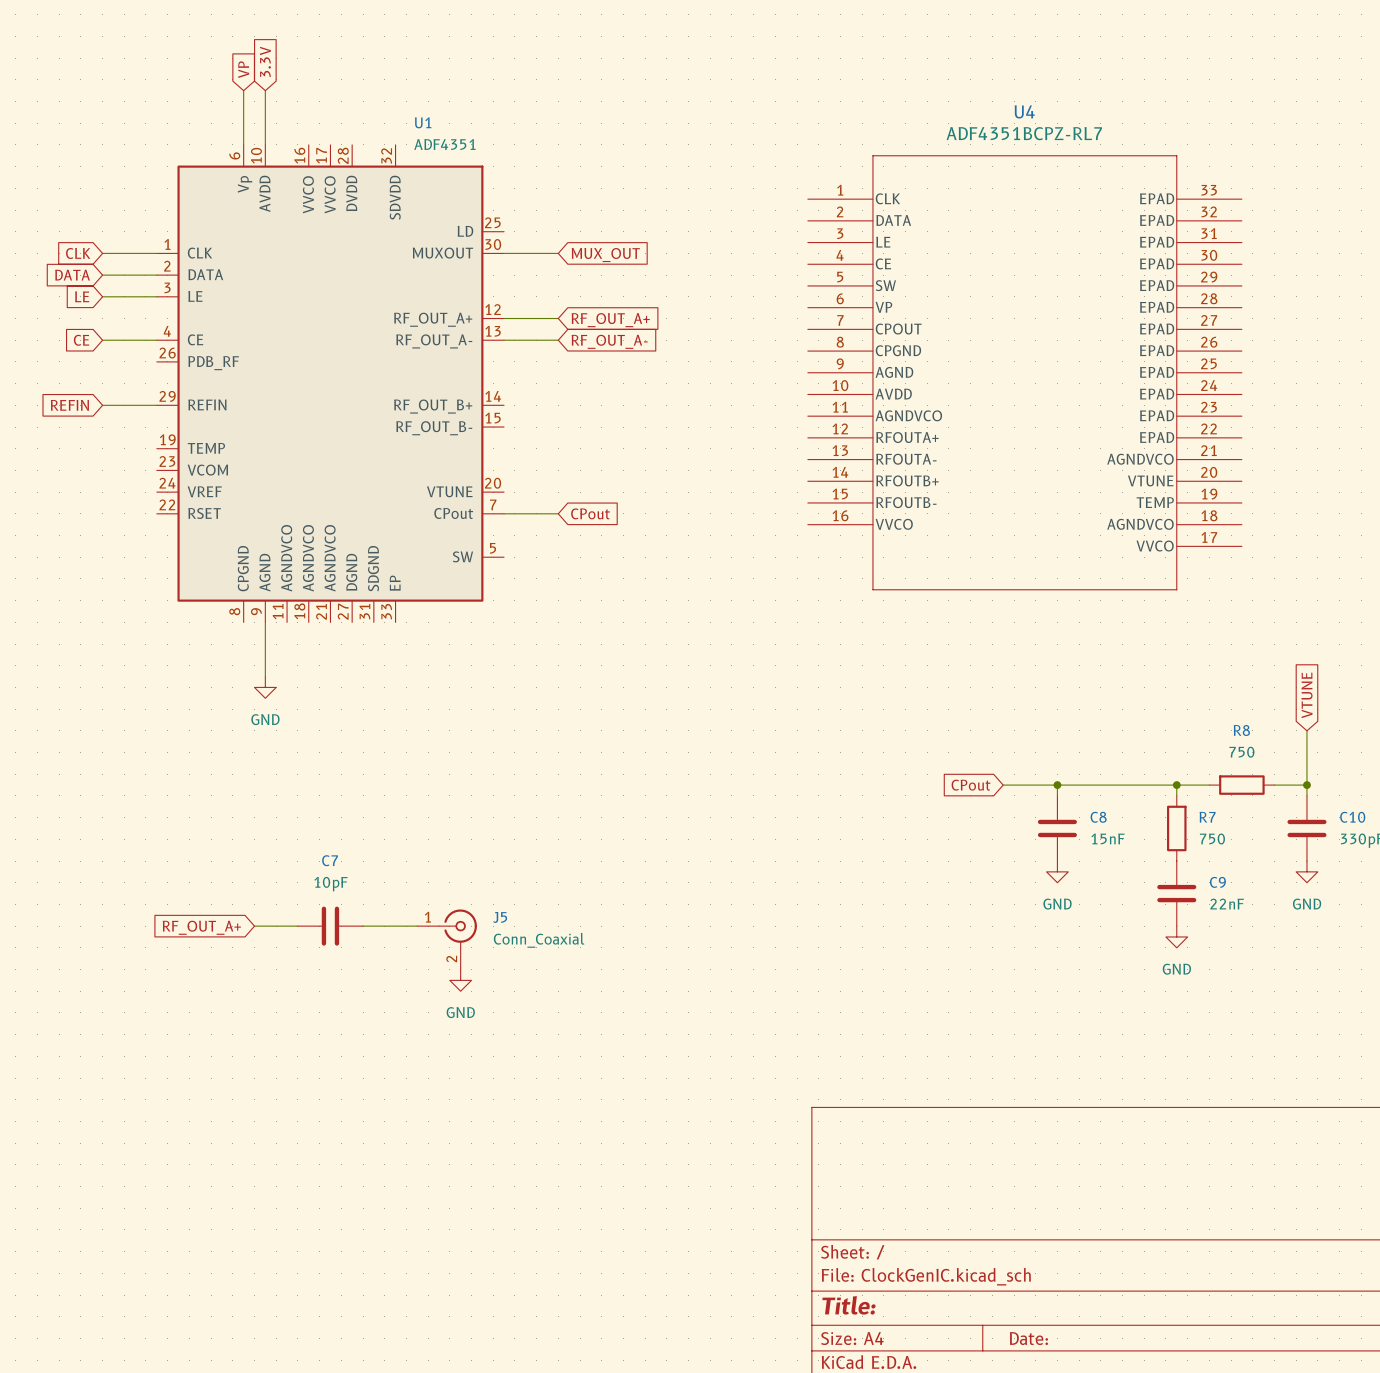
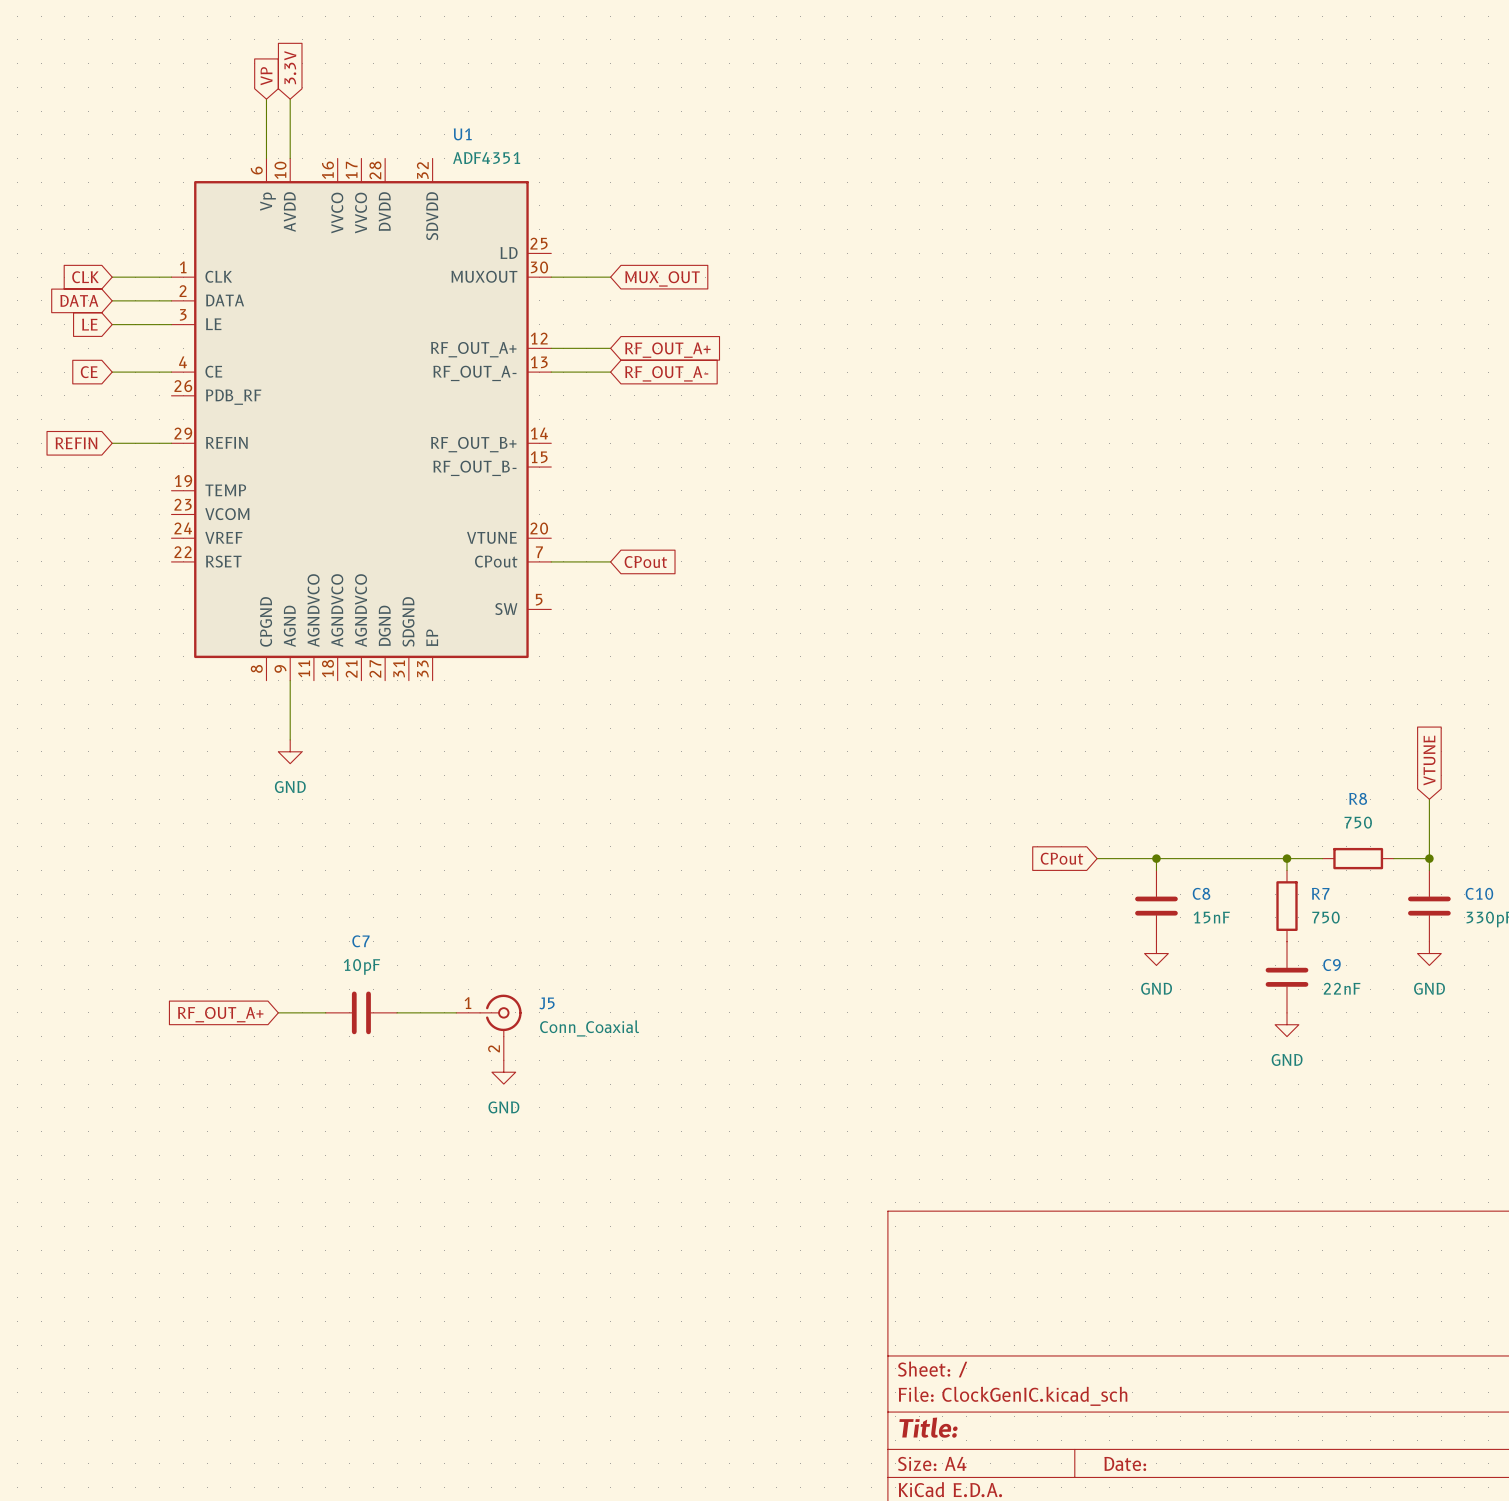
U4: ADF4351BCPZ-RL7 (1024, 372) -> none

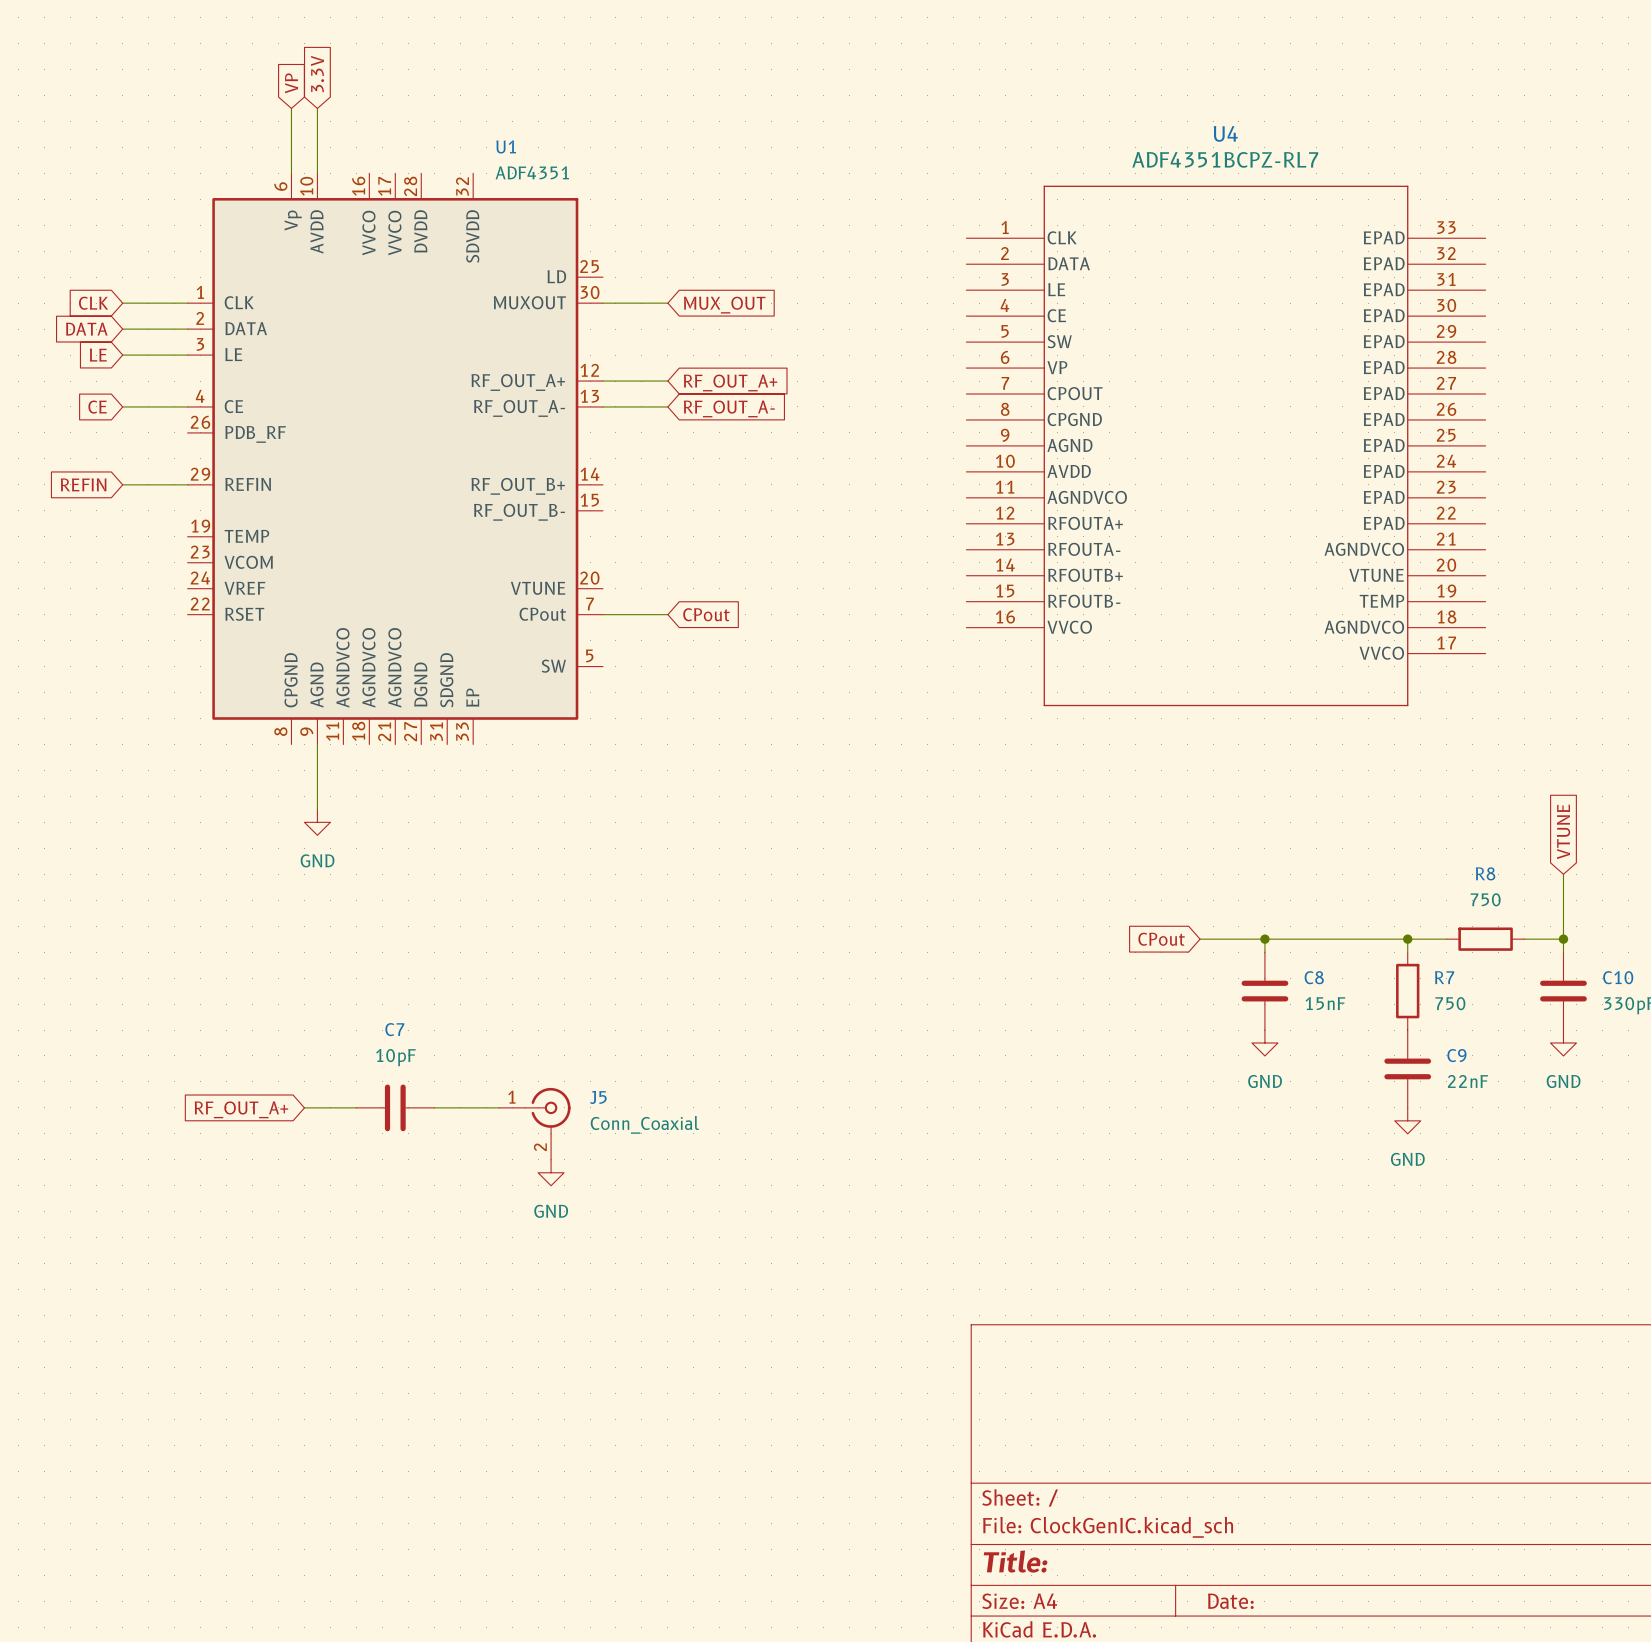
U4: none -> ADF4351BCPZ-RL7 (1226, 445)

